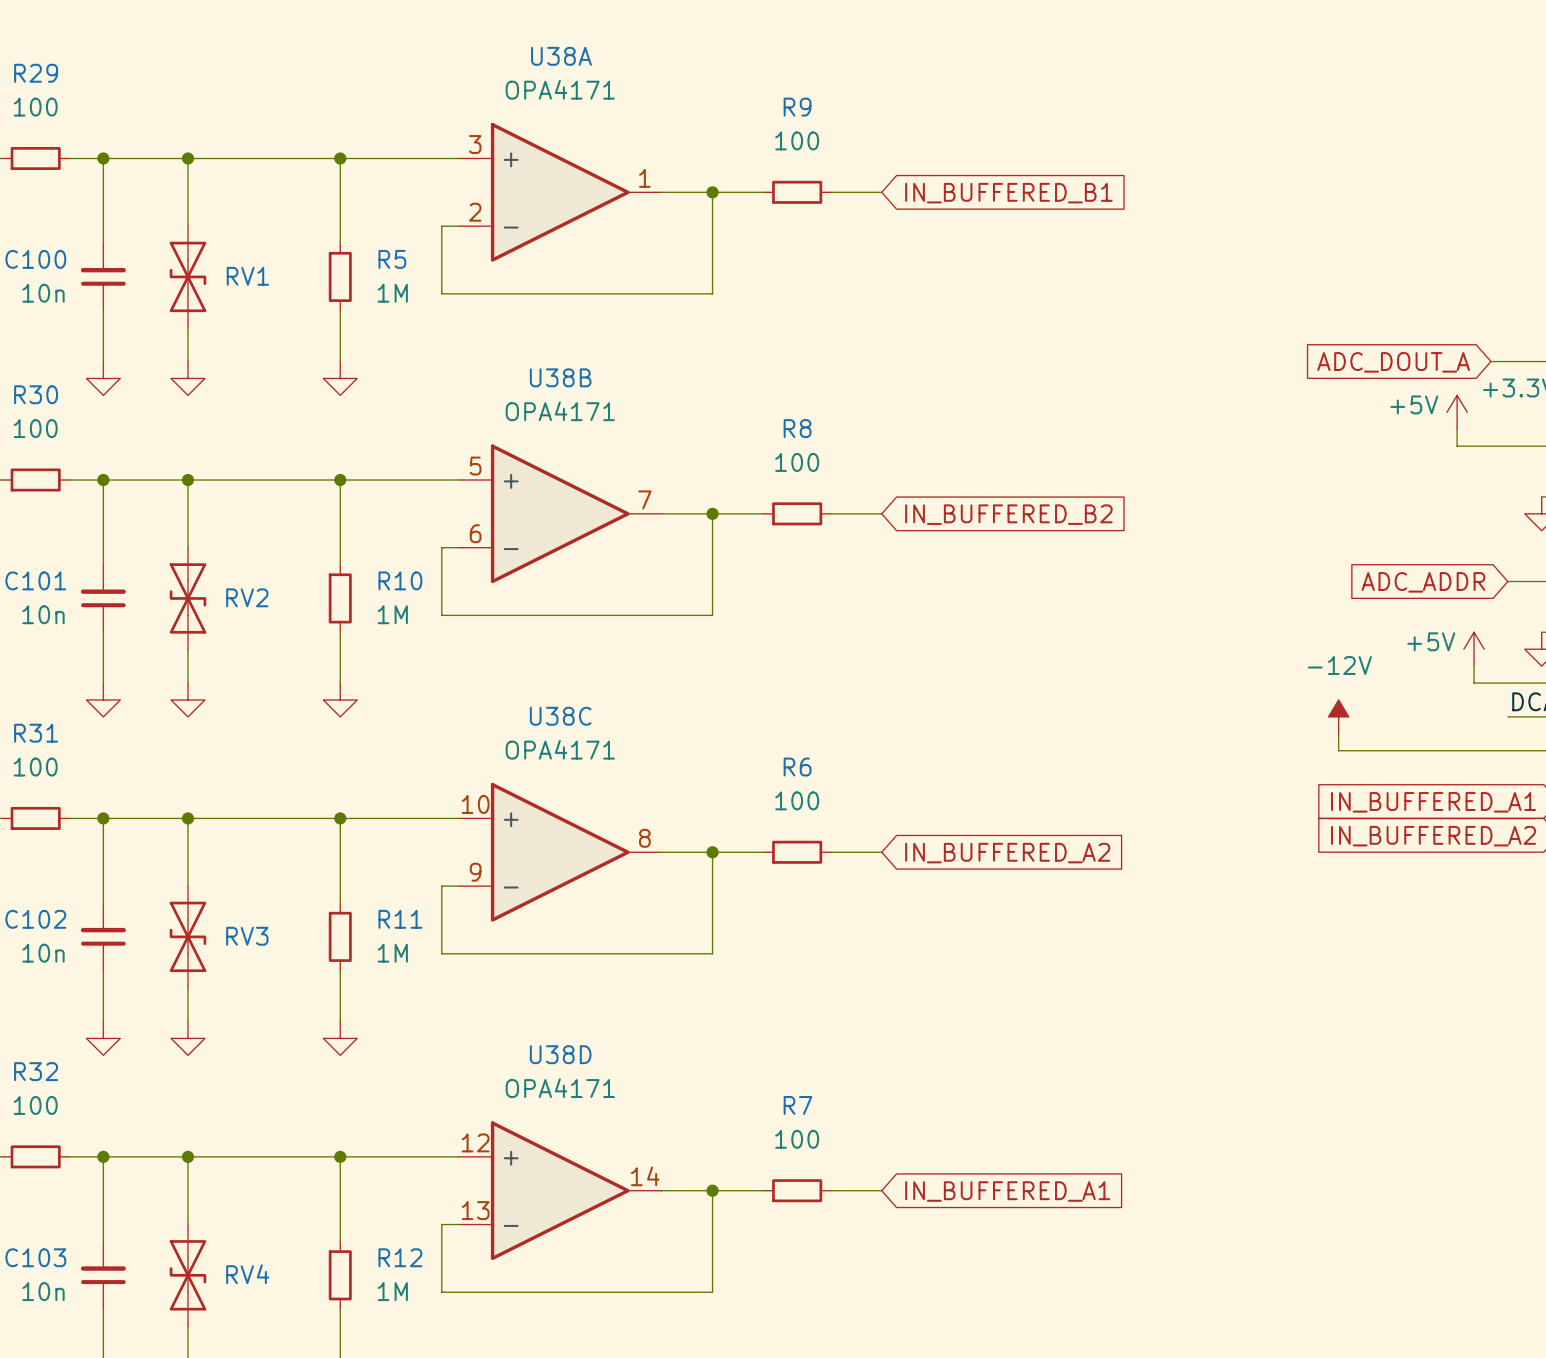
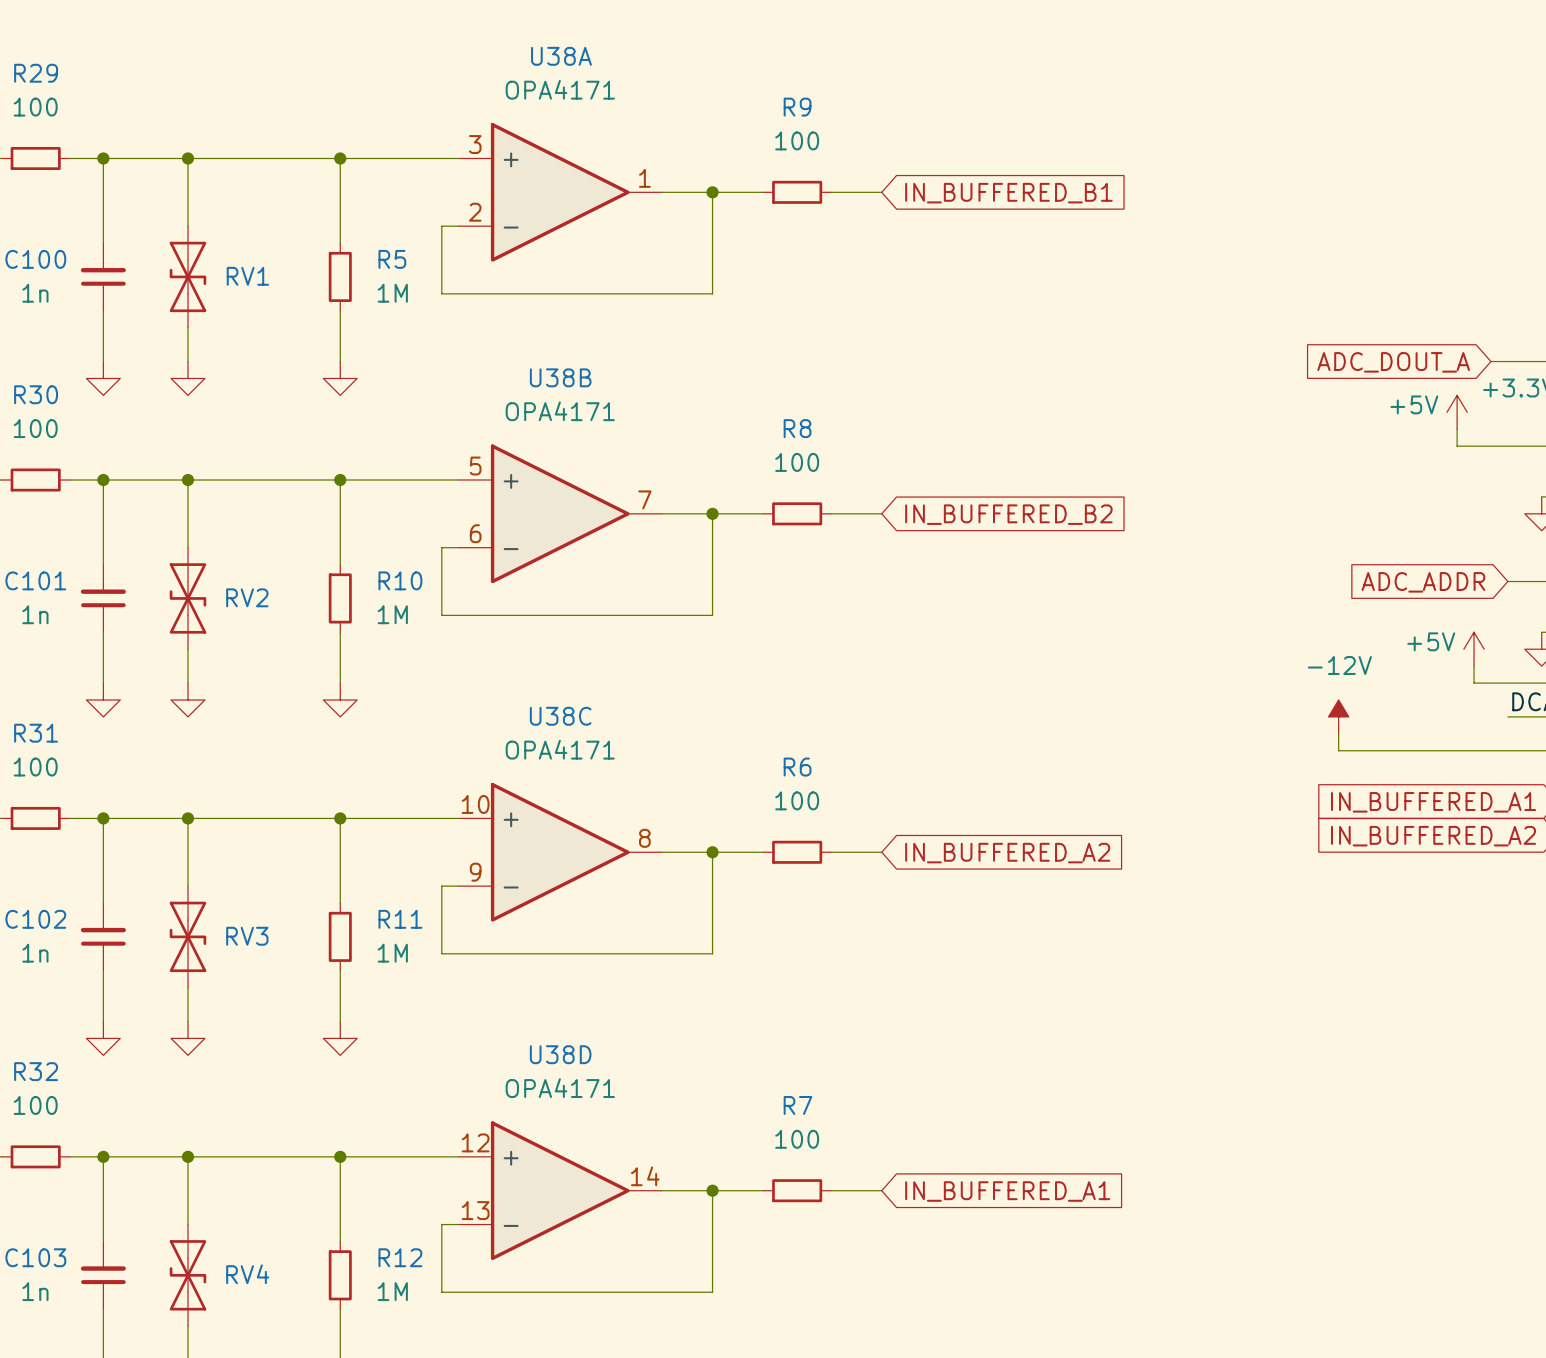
C100 value: 10n (43, 293) -> 1n (35, 293)
C101 value: 10n (43, 614) -> 1n (35, 614)
C102 value: 10n (43, 953) -> 1n (35, 953)
C103 value: 10n (43, 1291) -> 1n (35, 1291)

